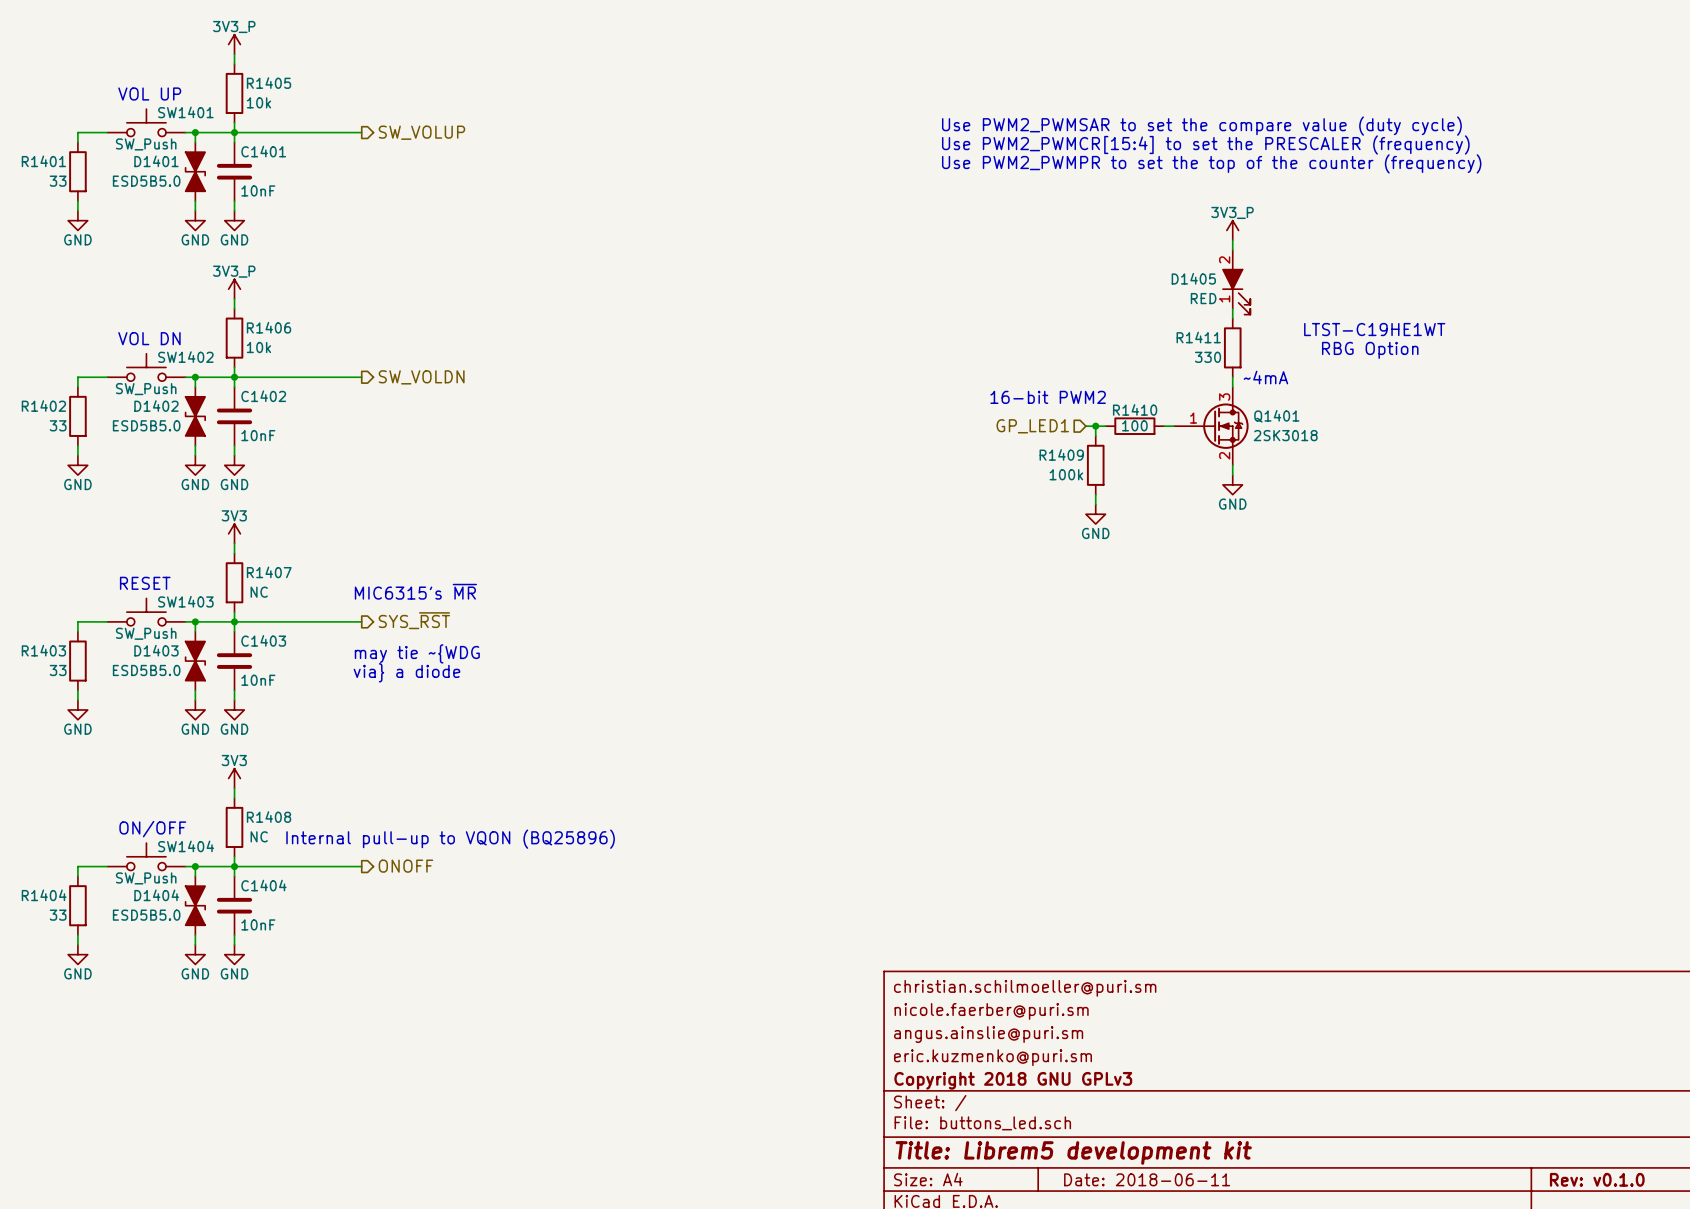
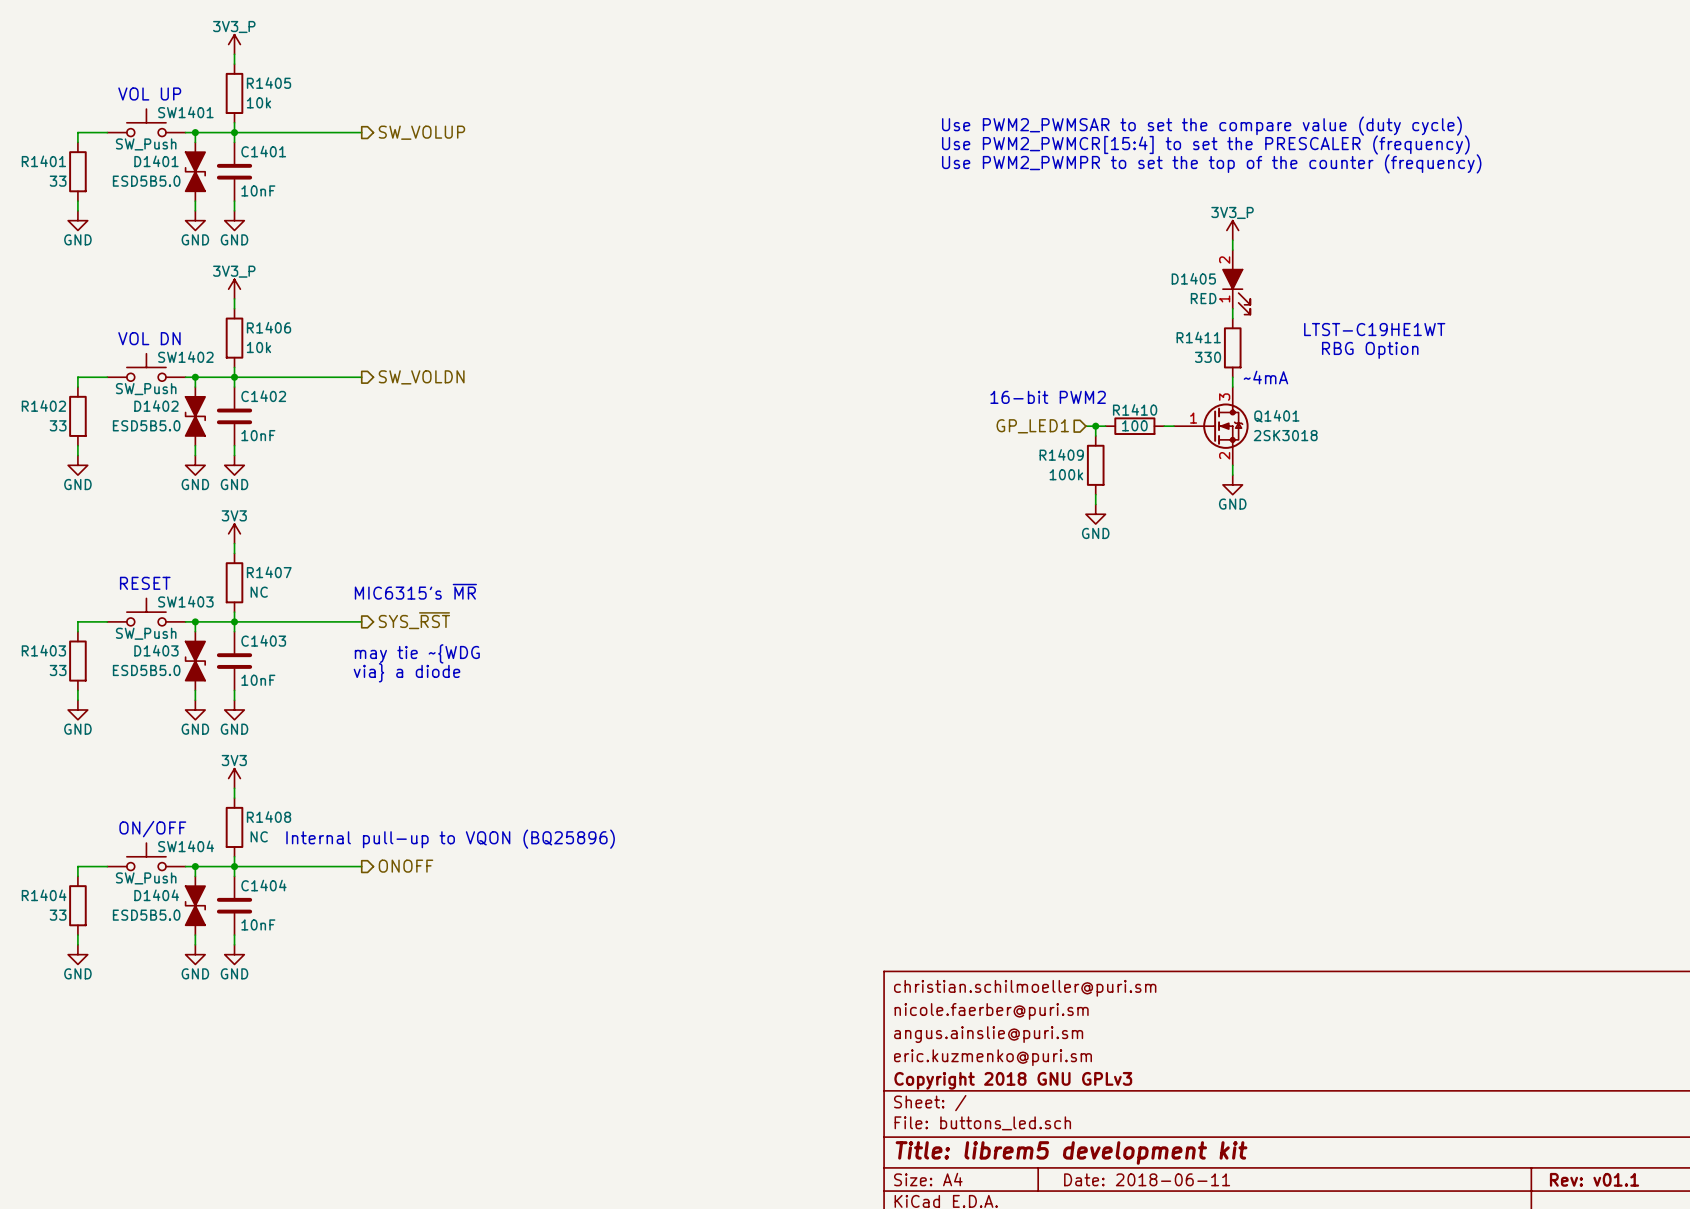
title block: Title: Librem5 development kit (1073, 1152) -> Title: librem5 development kit (1071, 1152)
title block: Rev: v0.1.0 (1597, 1179) -> Rev: v01.1 (1594, 1179)

